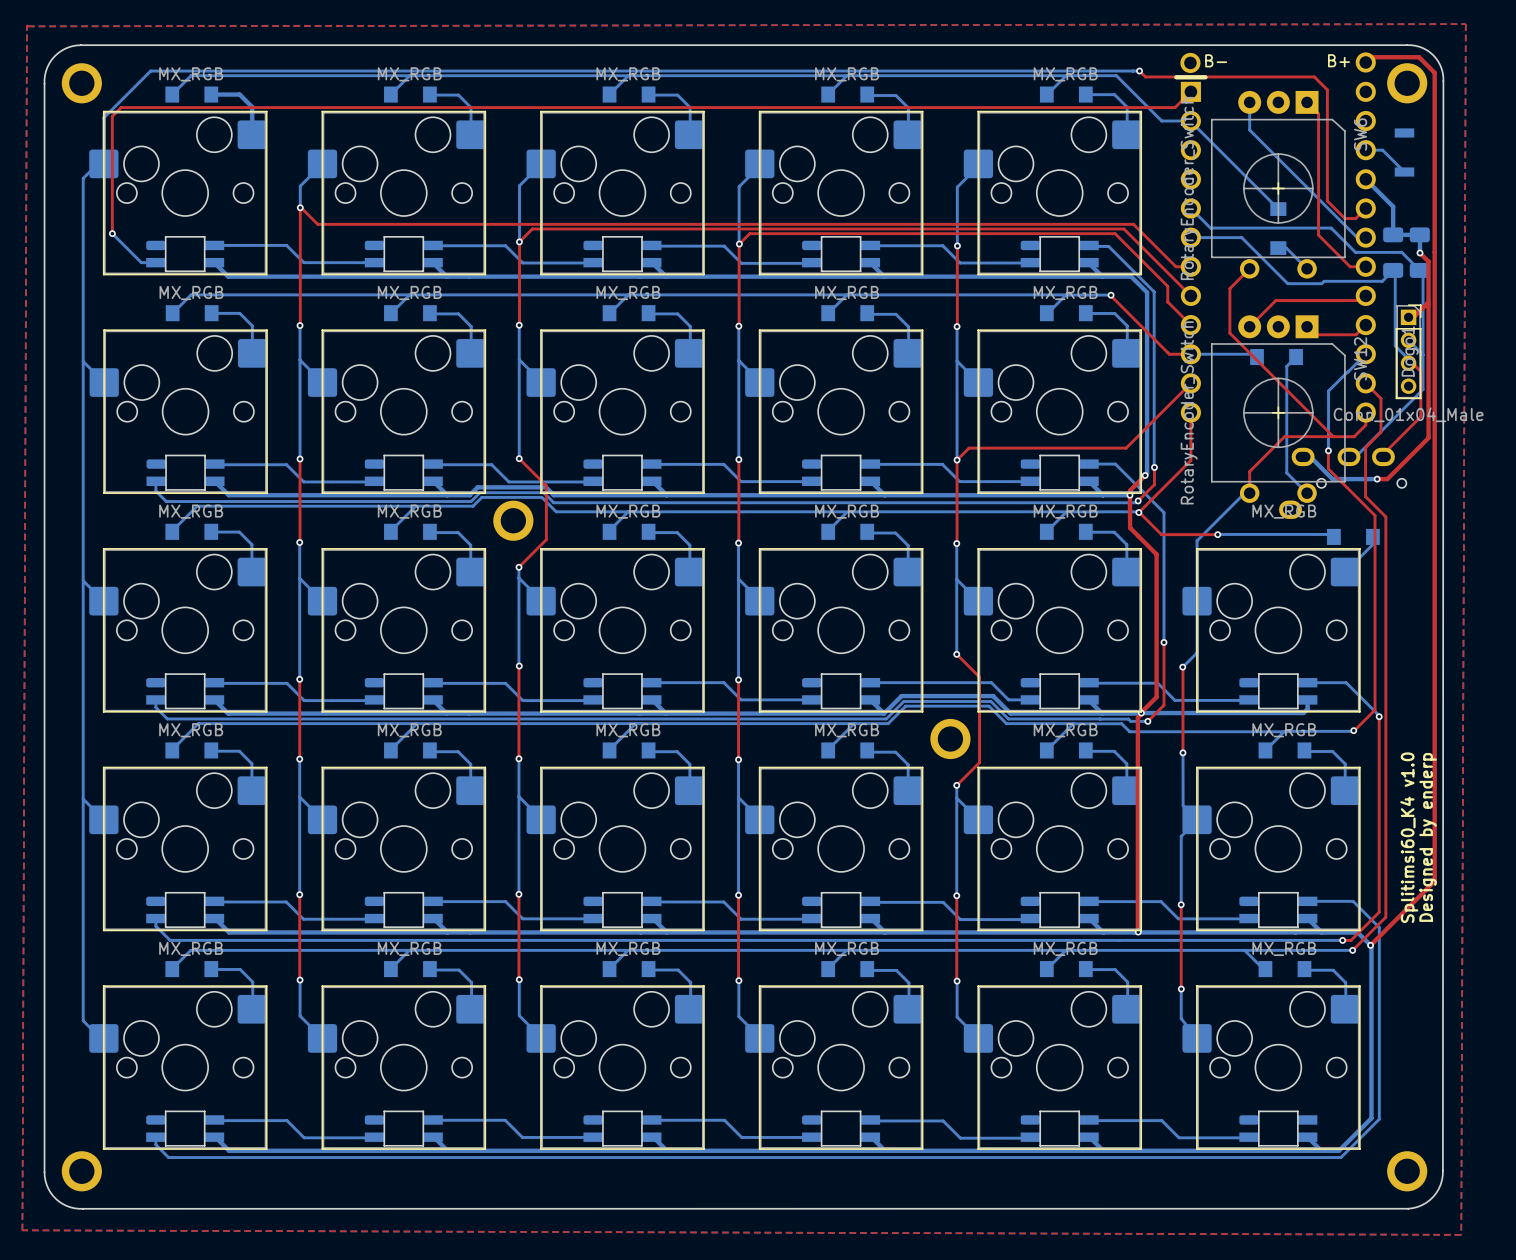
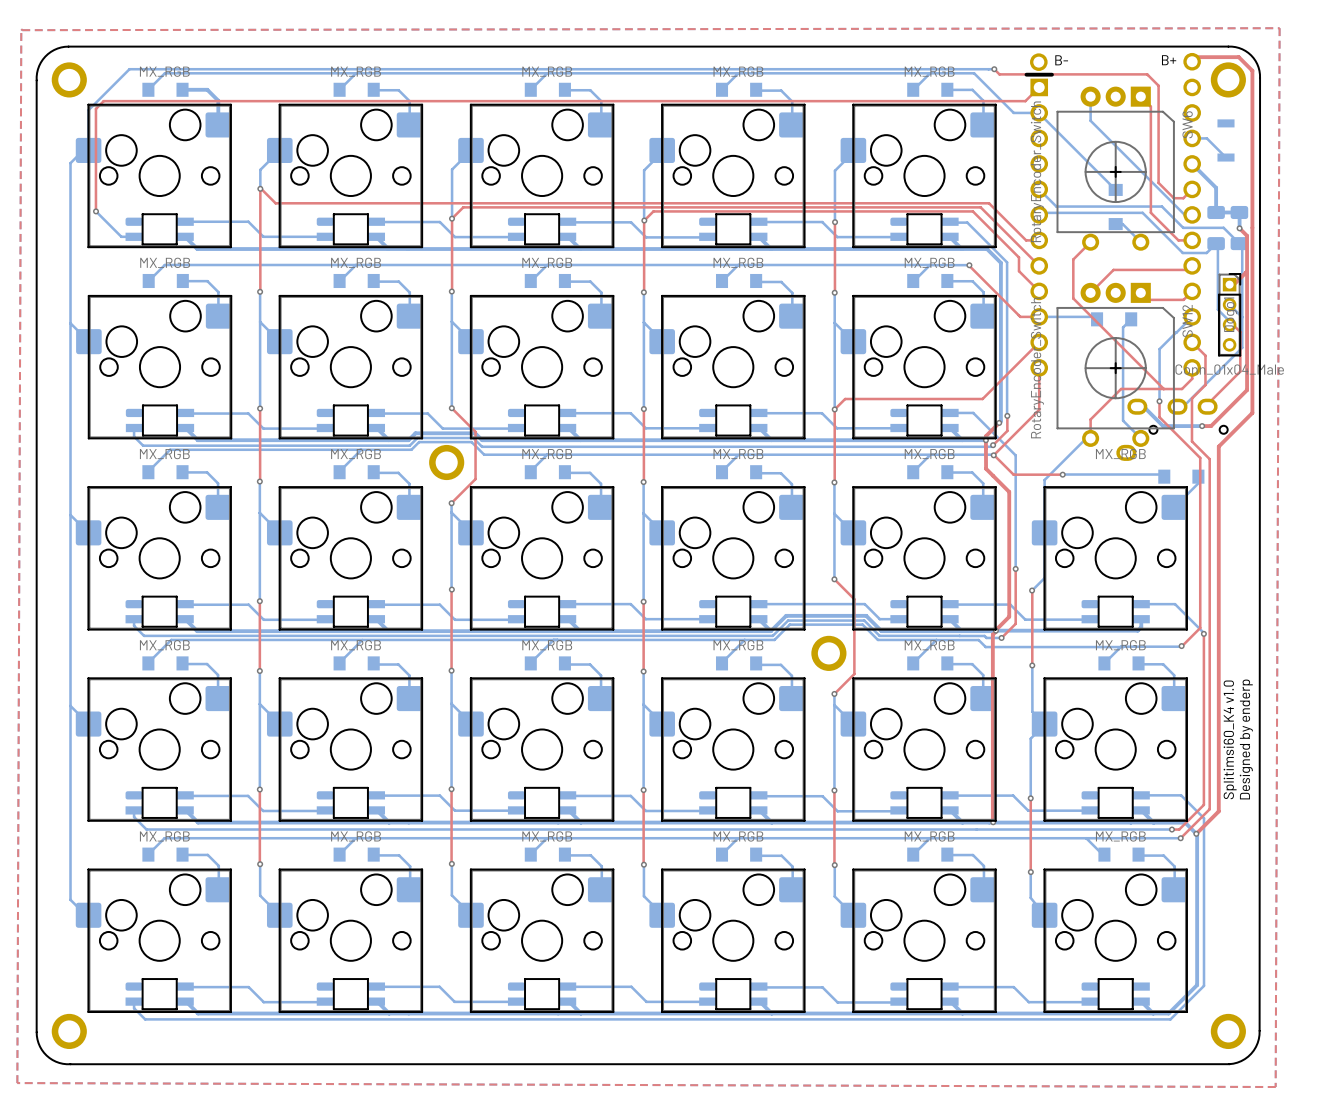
bottom track: (1190, 237) (1241, 237) (1287, 283) (1382, 281) -> (1039, 214) (1041, 212) (1142, 212) (1182, 253) (1206, 253)
top track: (1434, 464) (1434, 881) (1396, 919) -> (1252, 412) (1218, 446) (1218, 811)

